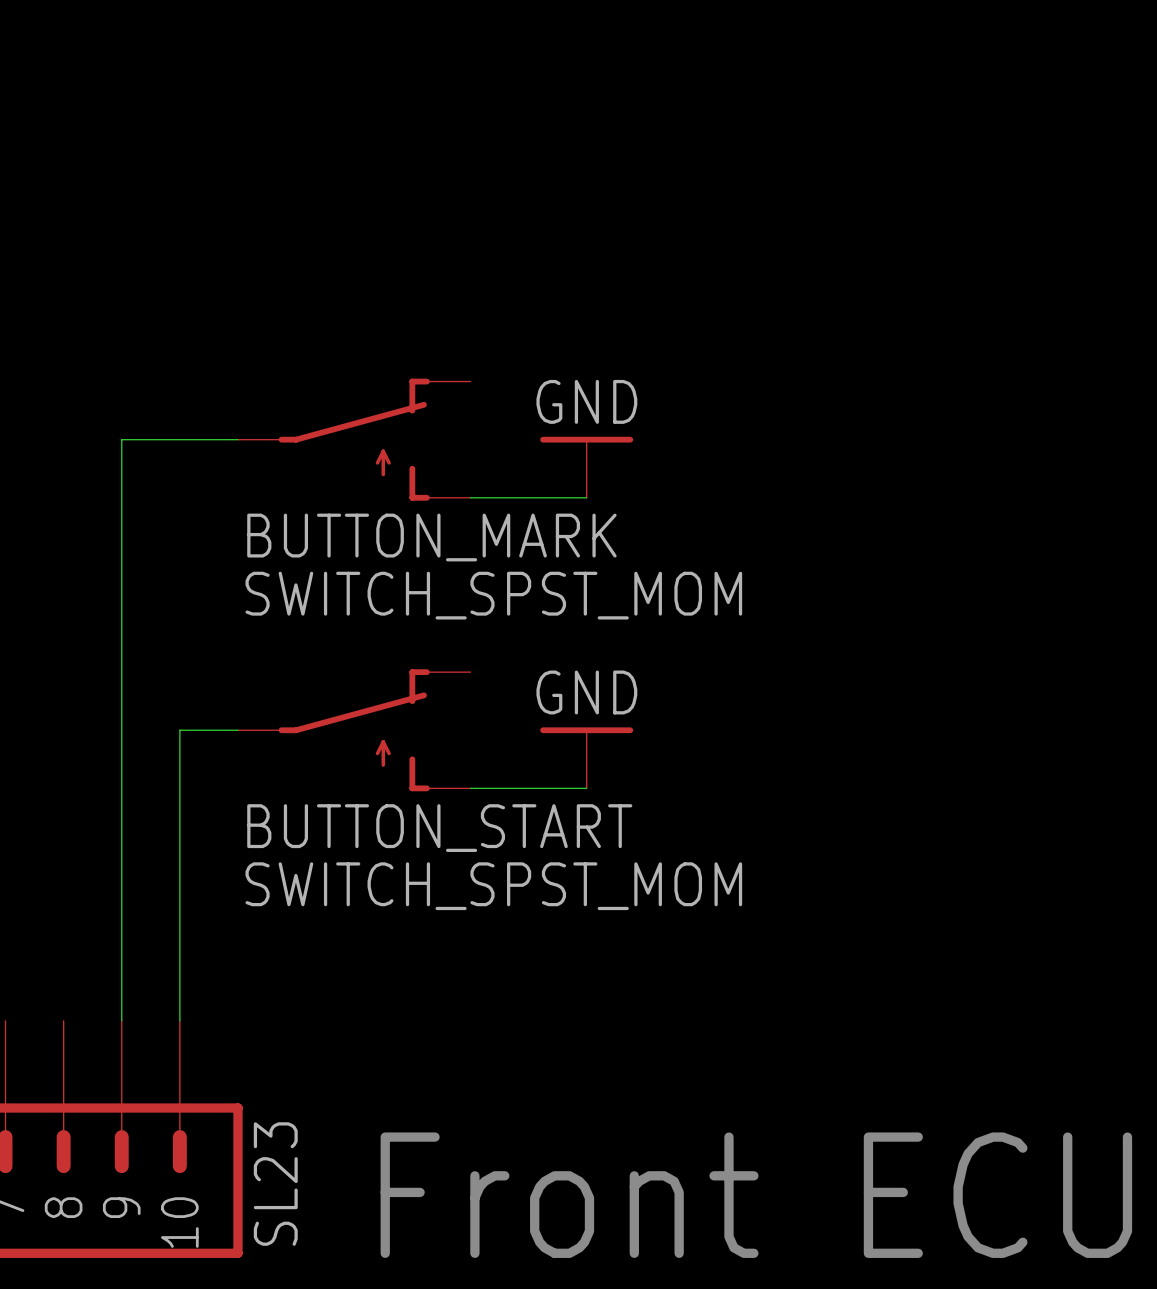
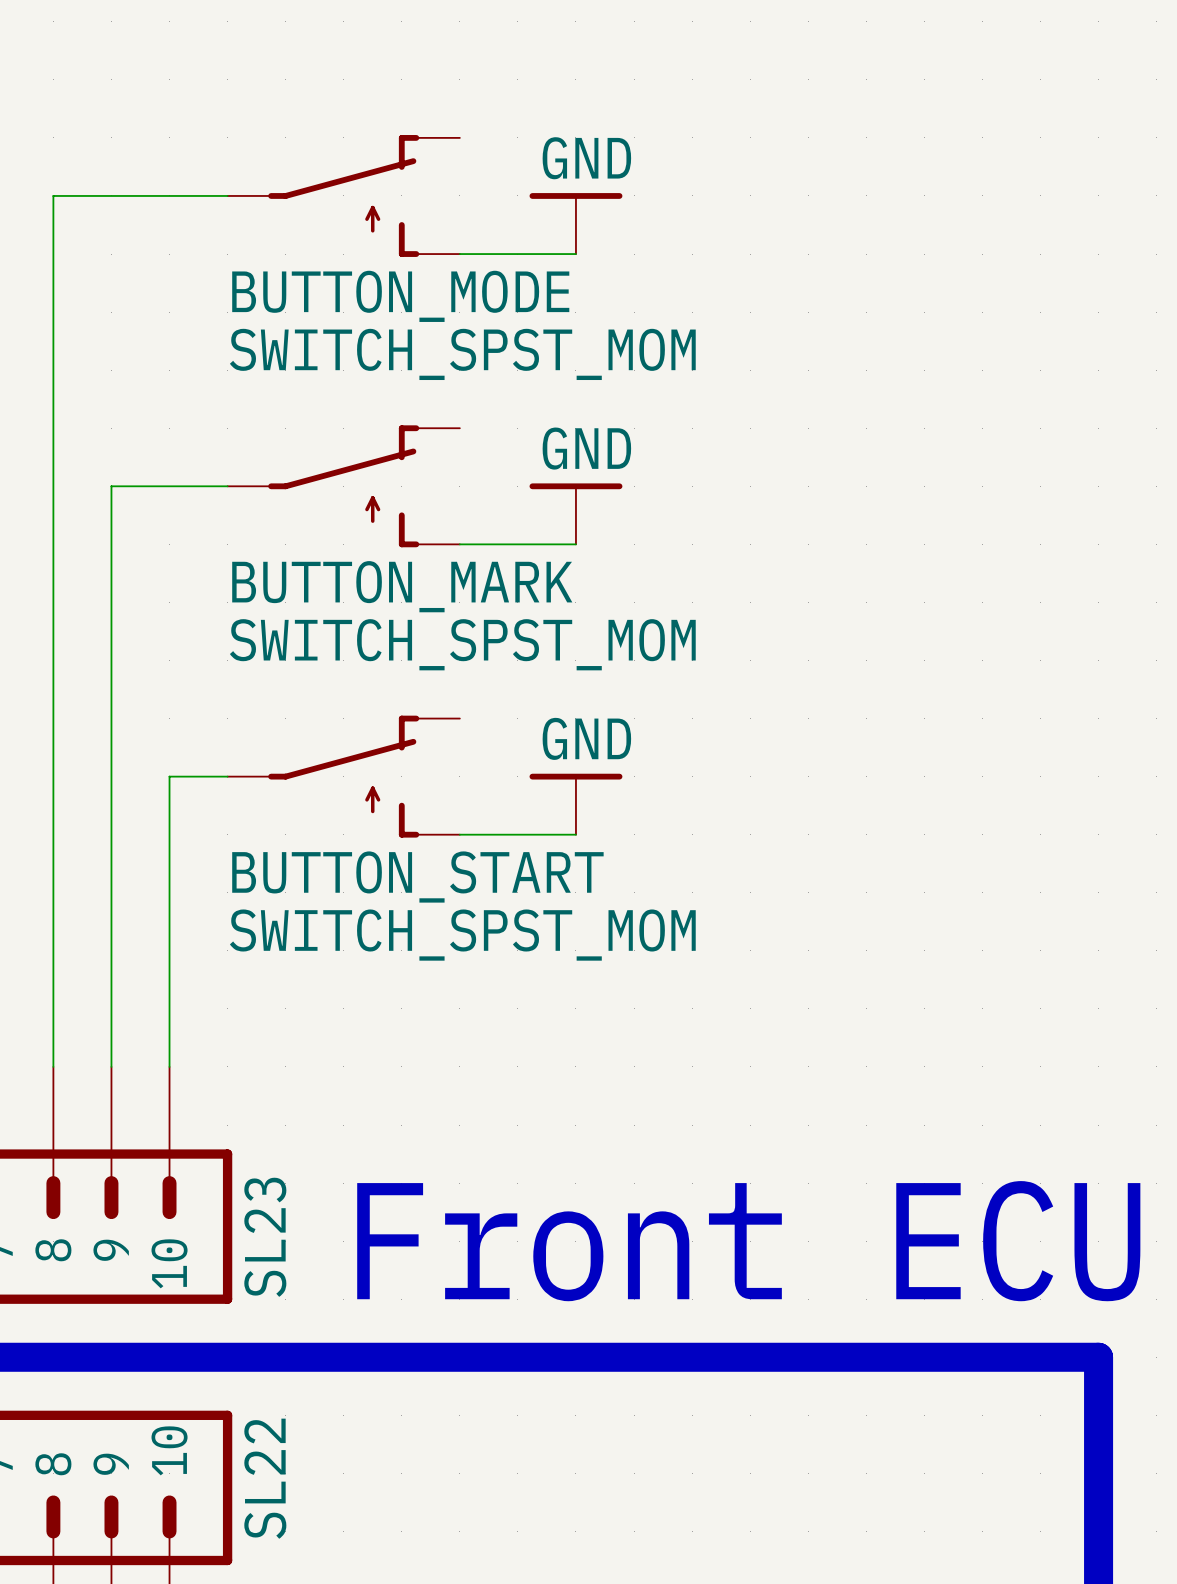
wire: none -> (227, 195) (53, 195) (53, 1066)
BUTTON_MODE: none -> SWITCH_SPST_MOM (343, 195)
power symbol: none -> GND (575, 223)
wire: none -> (459, 254) (575, 254)

